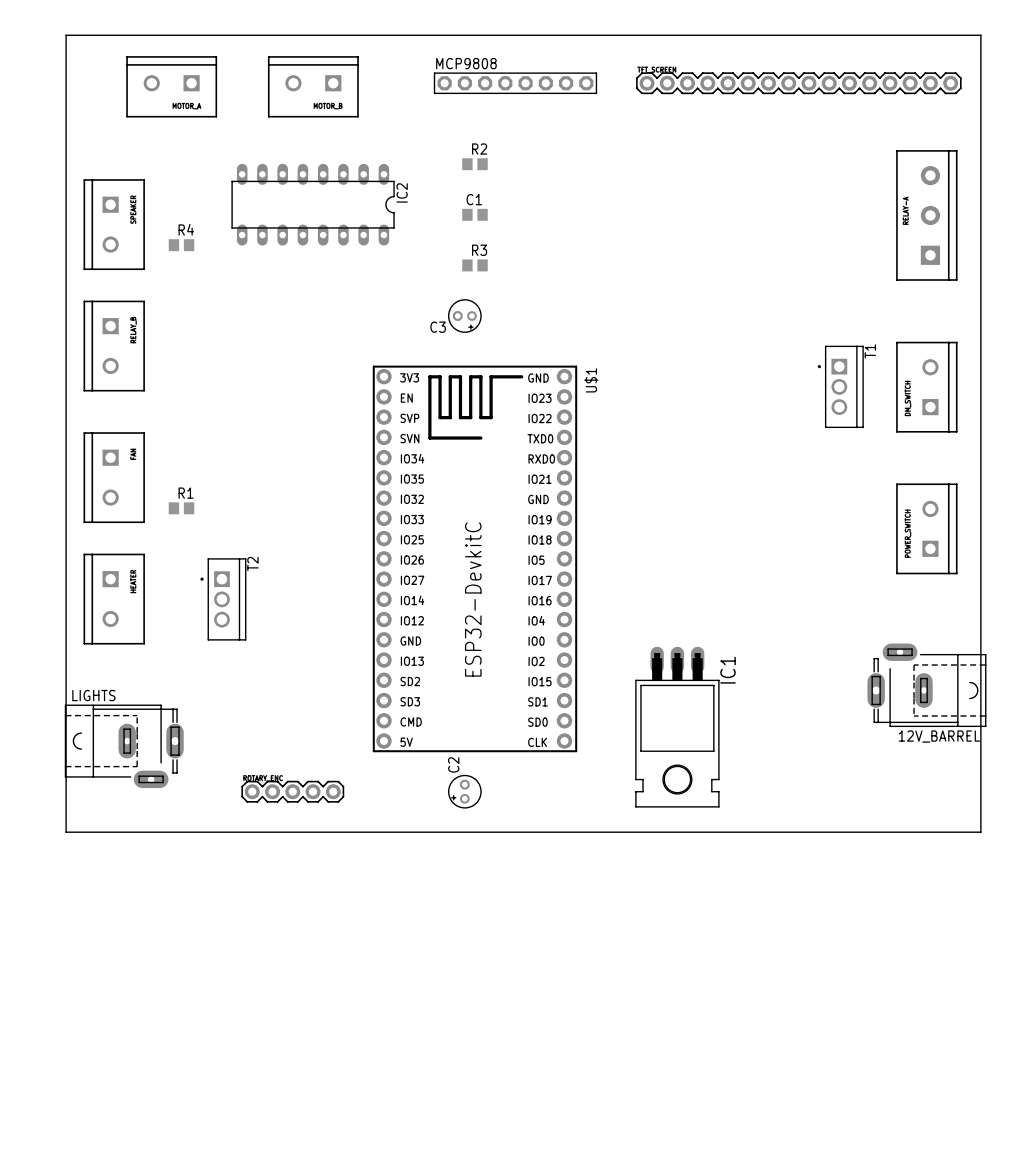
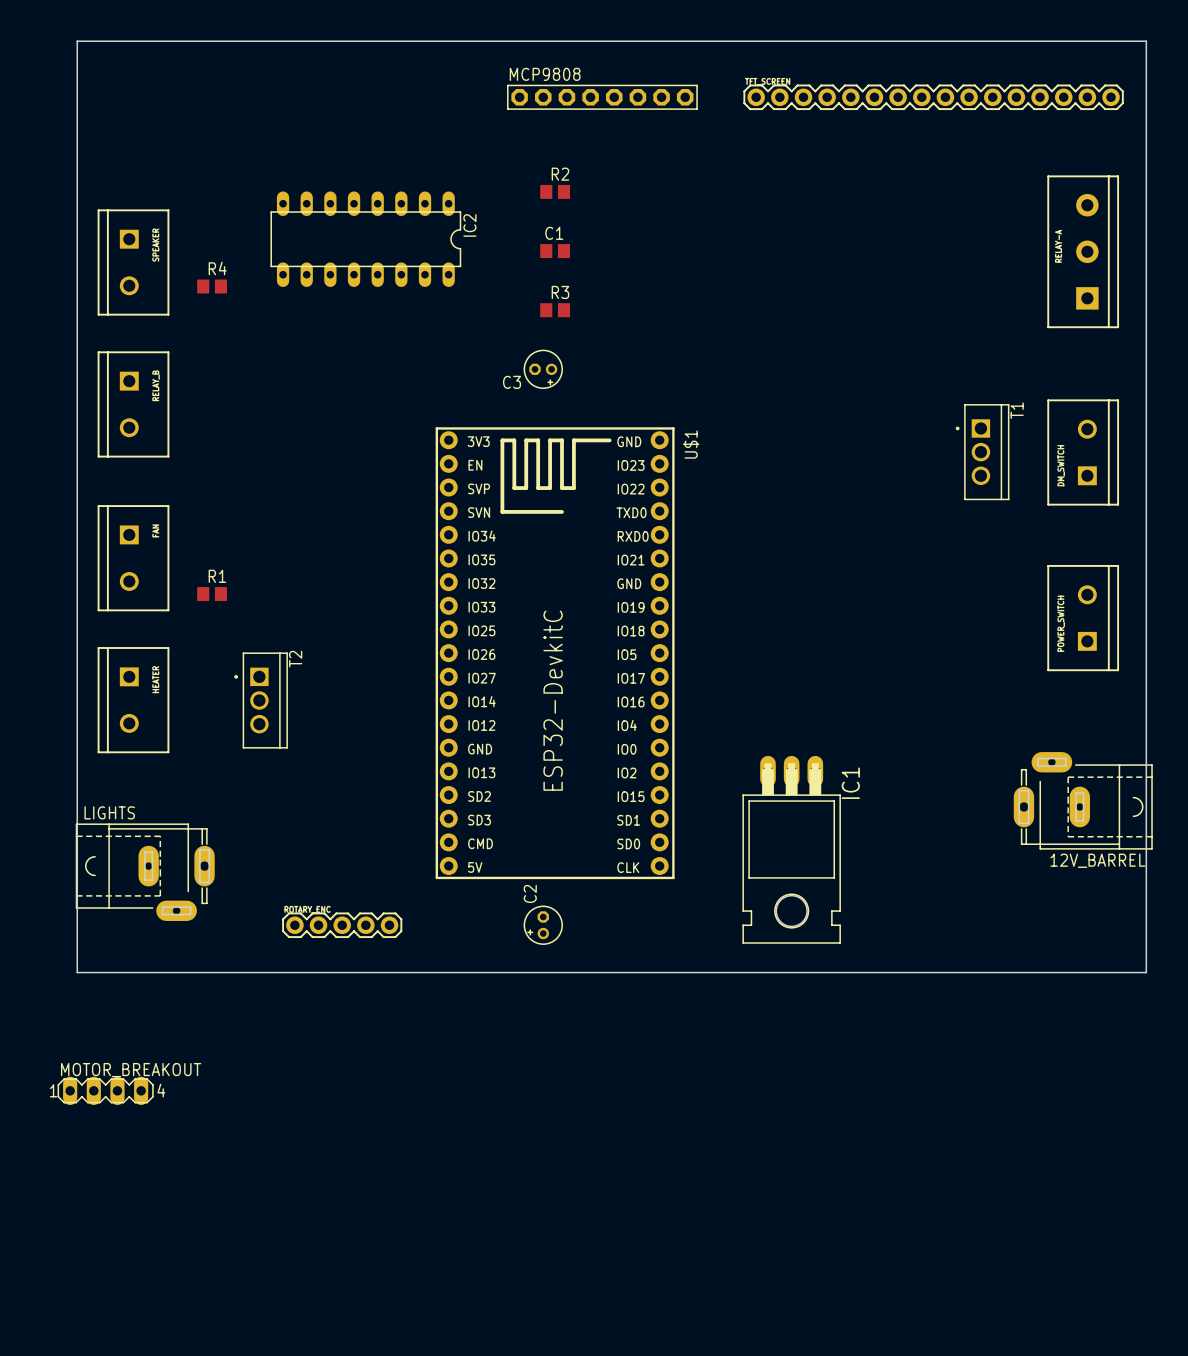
part: (171, 86) -> none
part: (313, 86) -> none
MOTOR_BREAKOUT: none -> (105, 1090)

